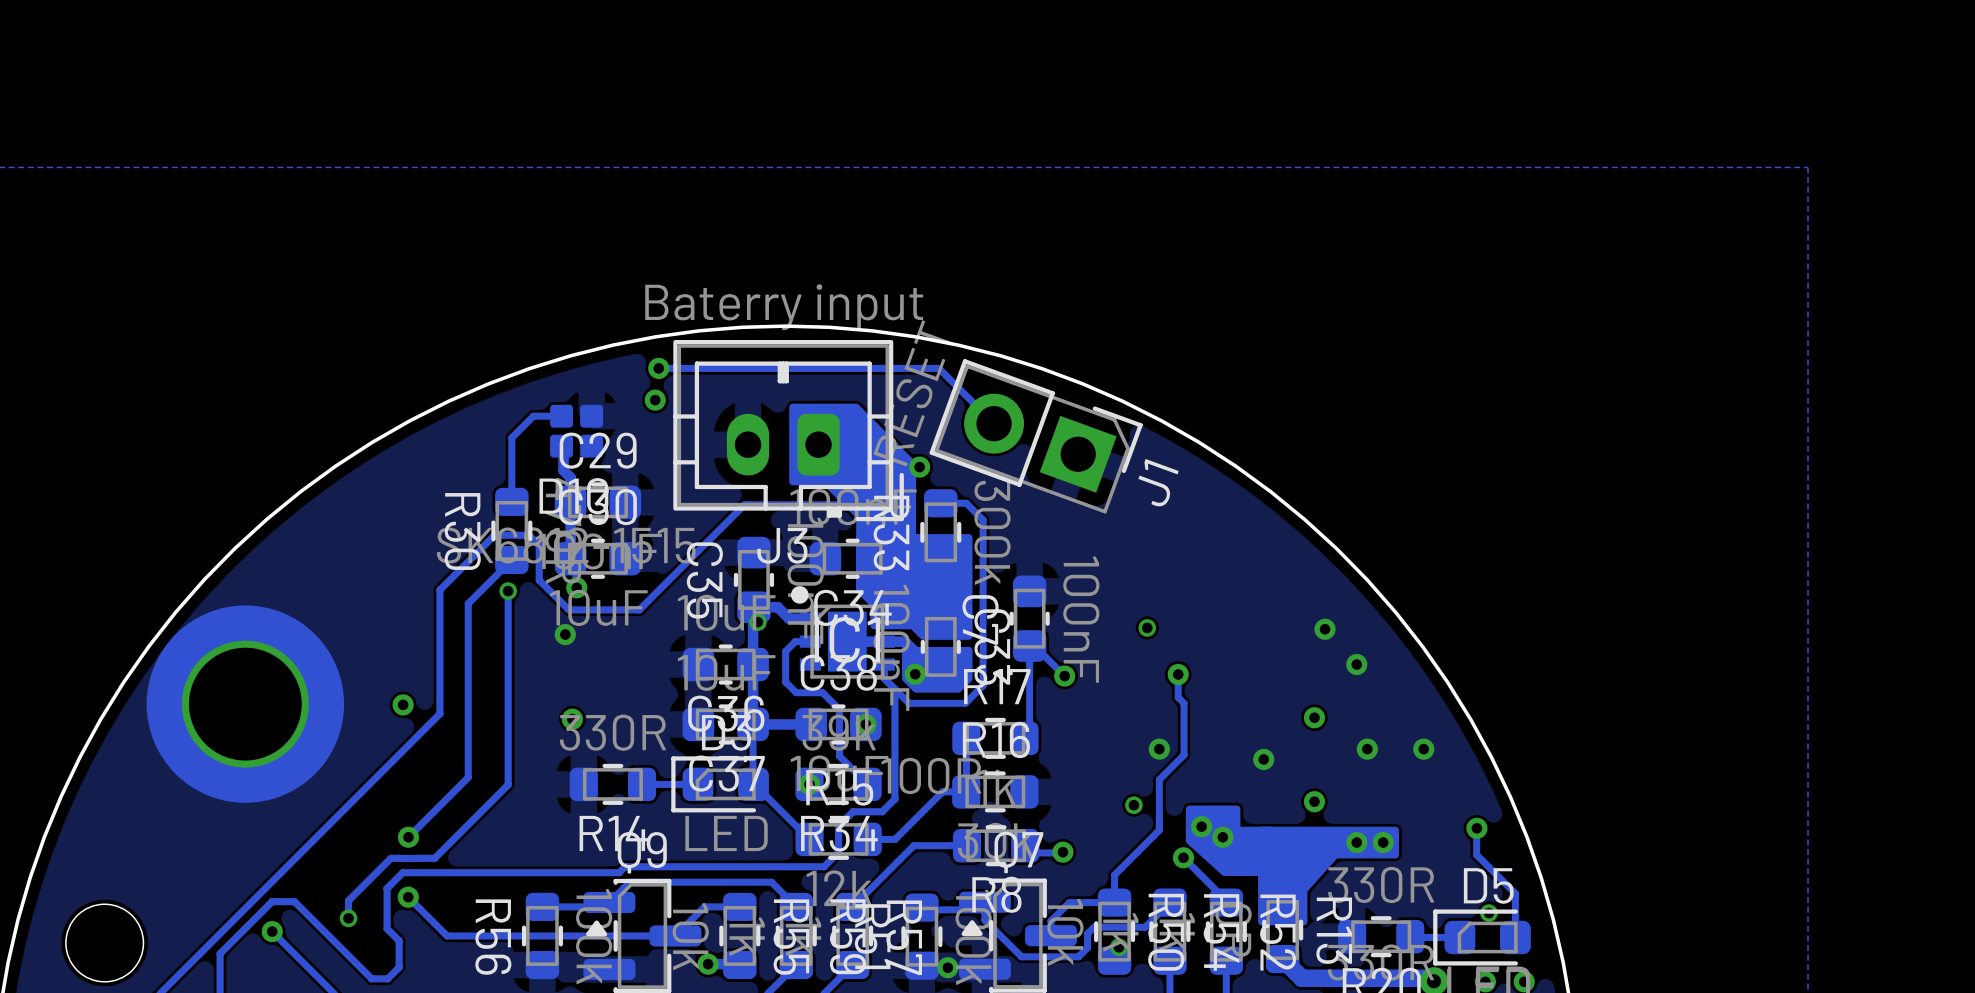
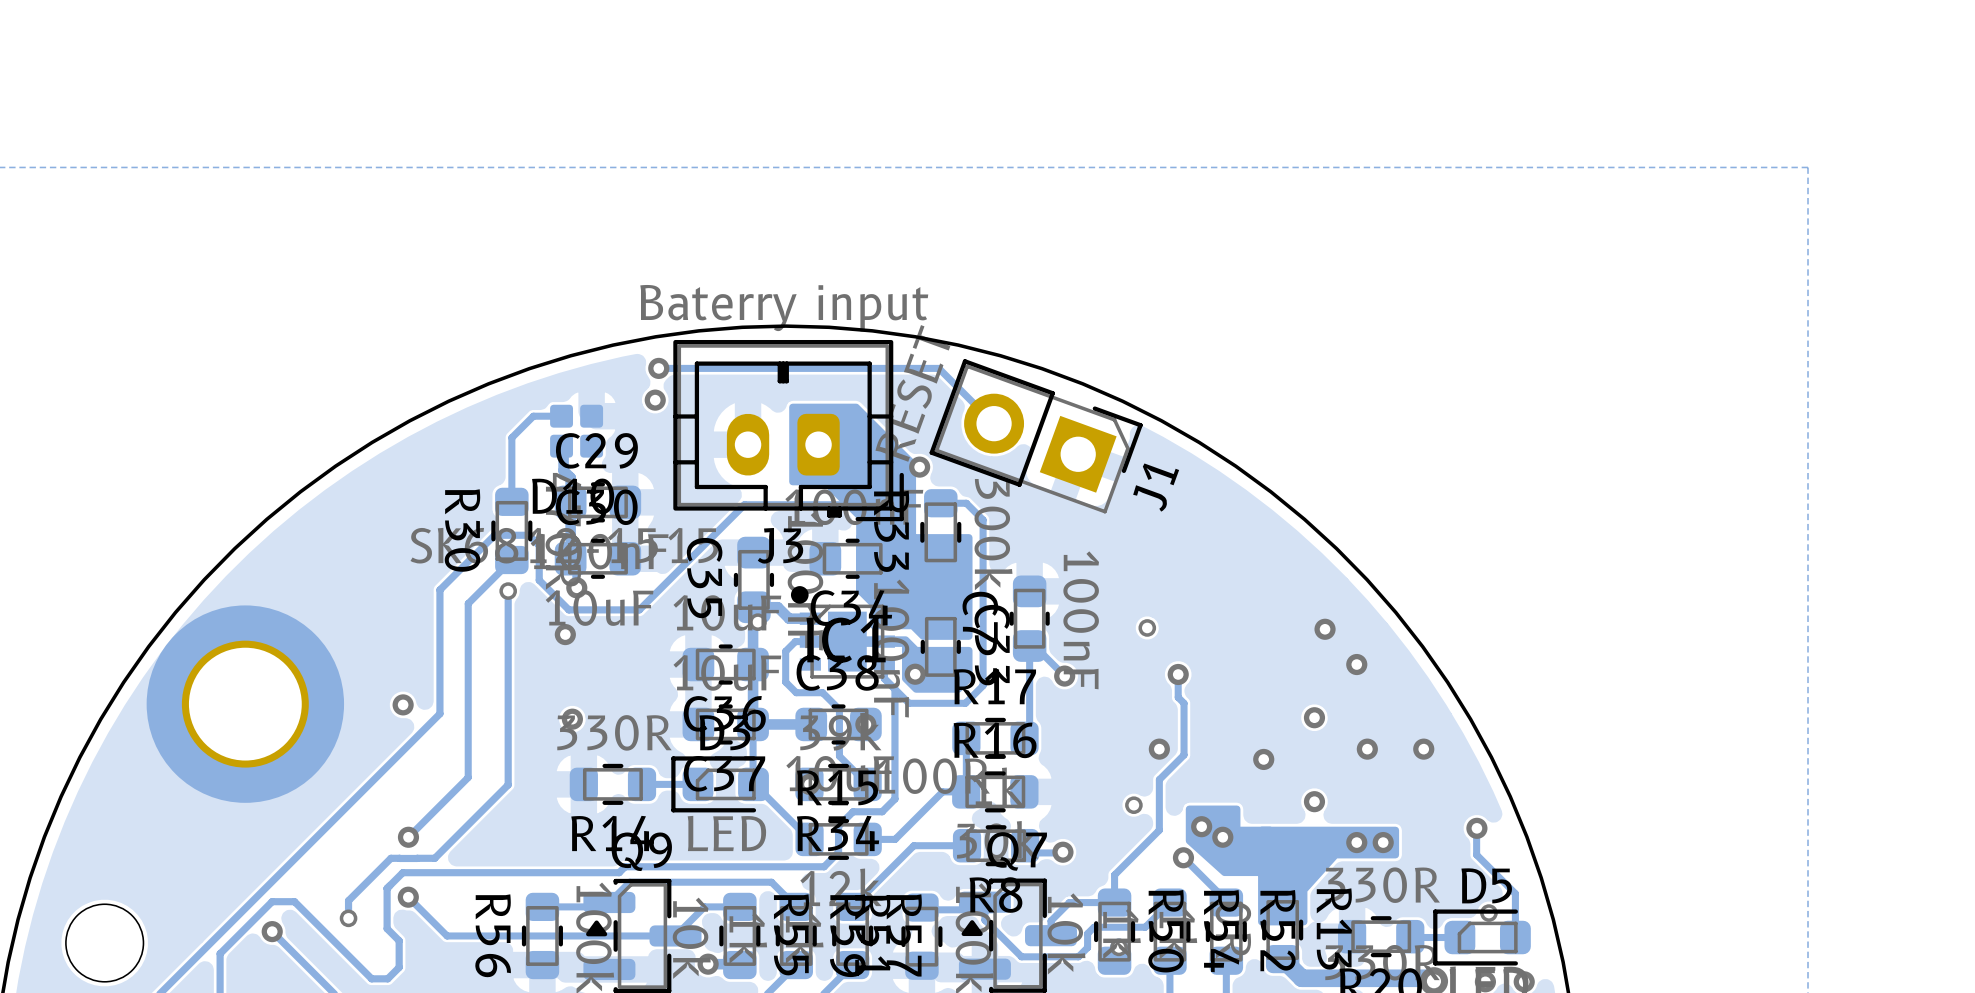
via: (947, 967) -> none

